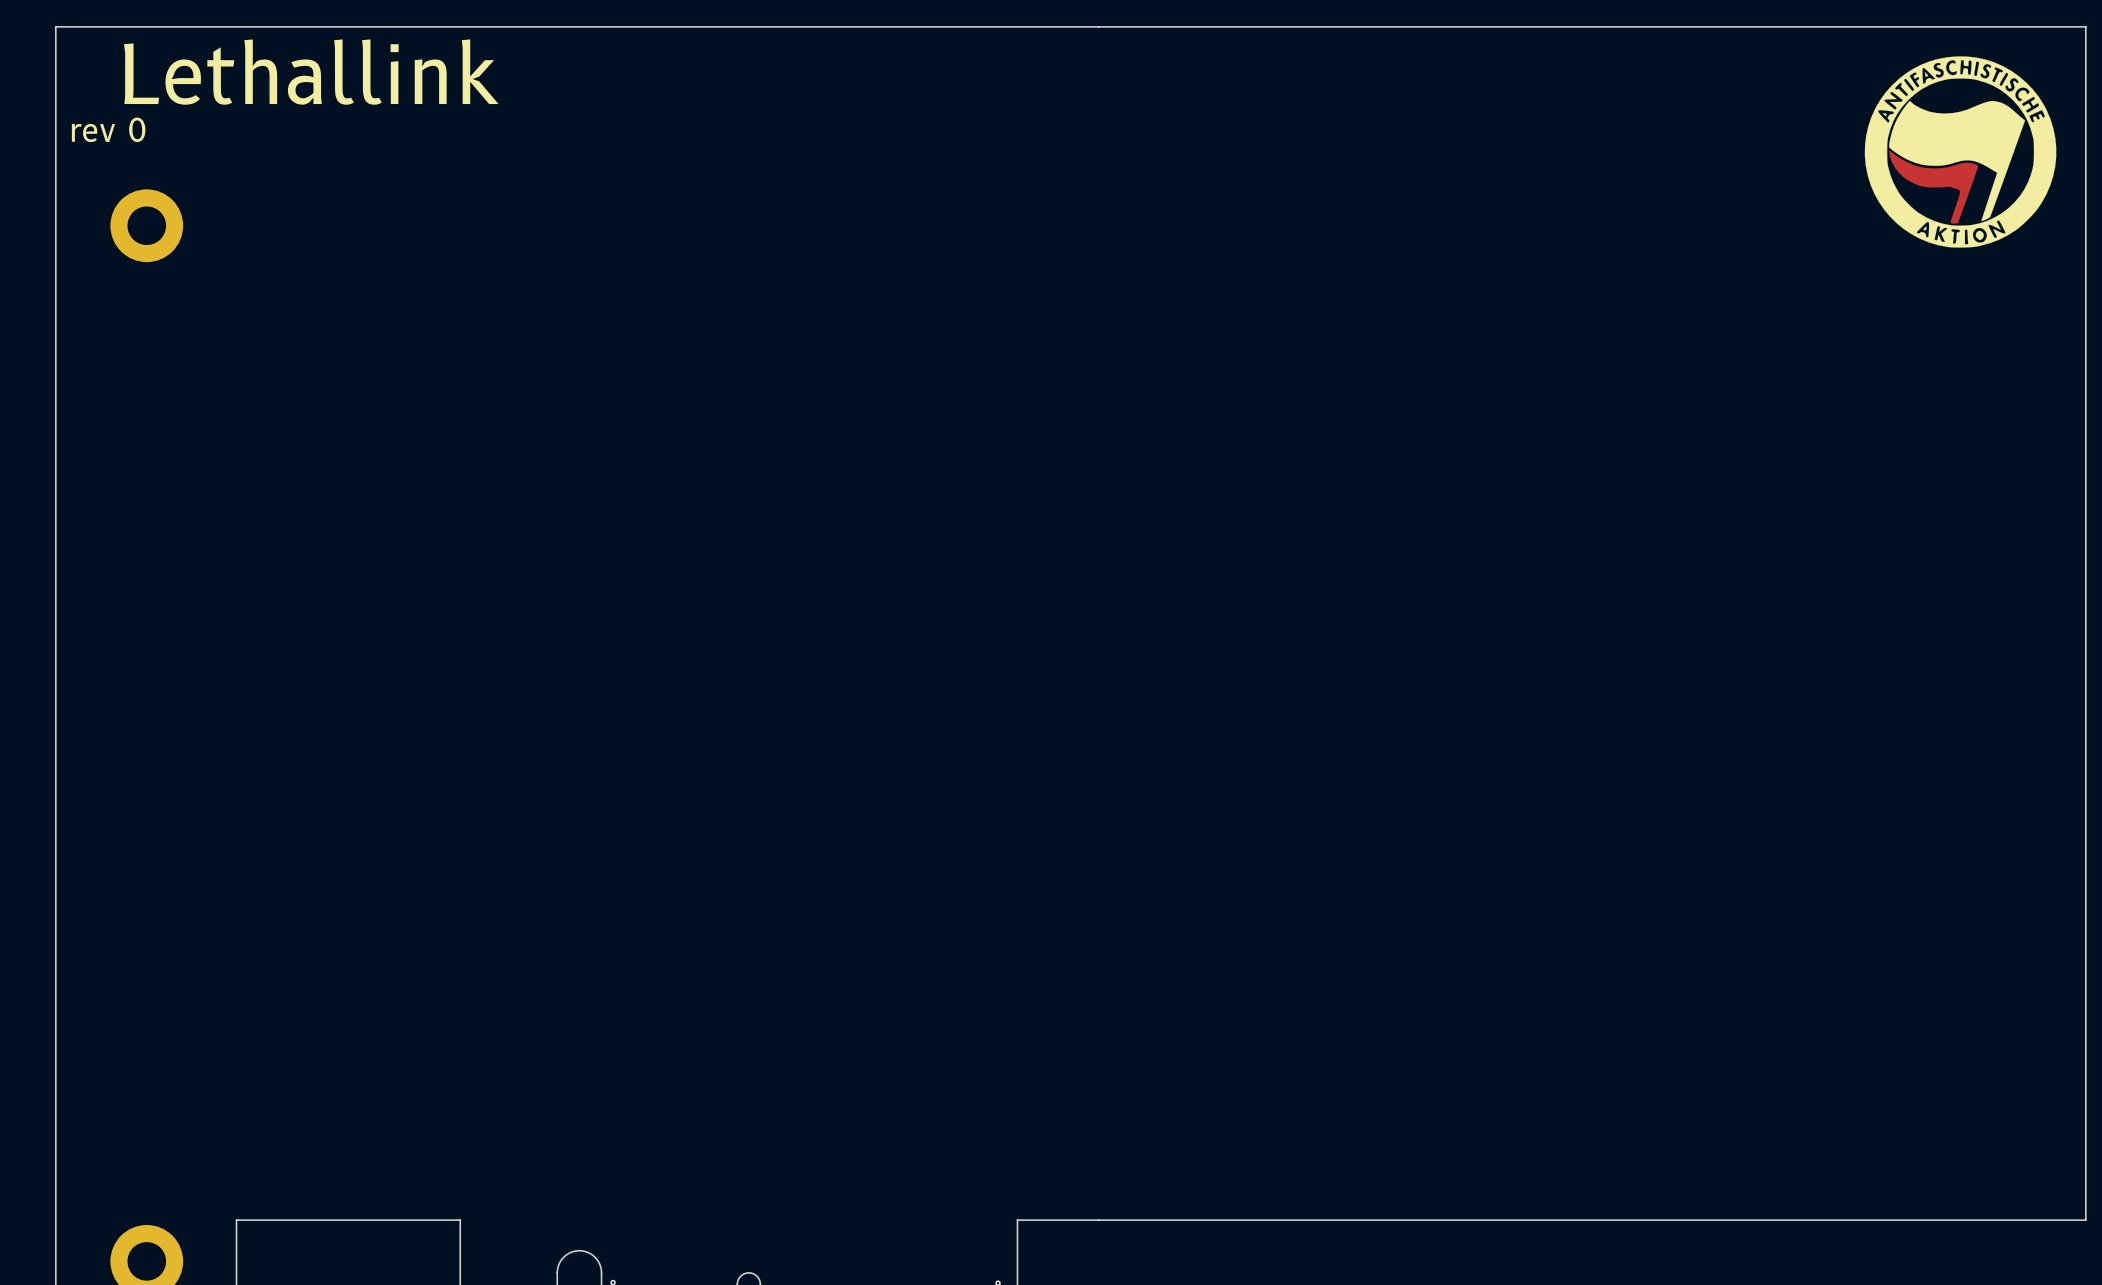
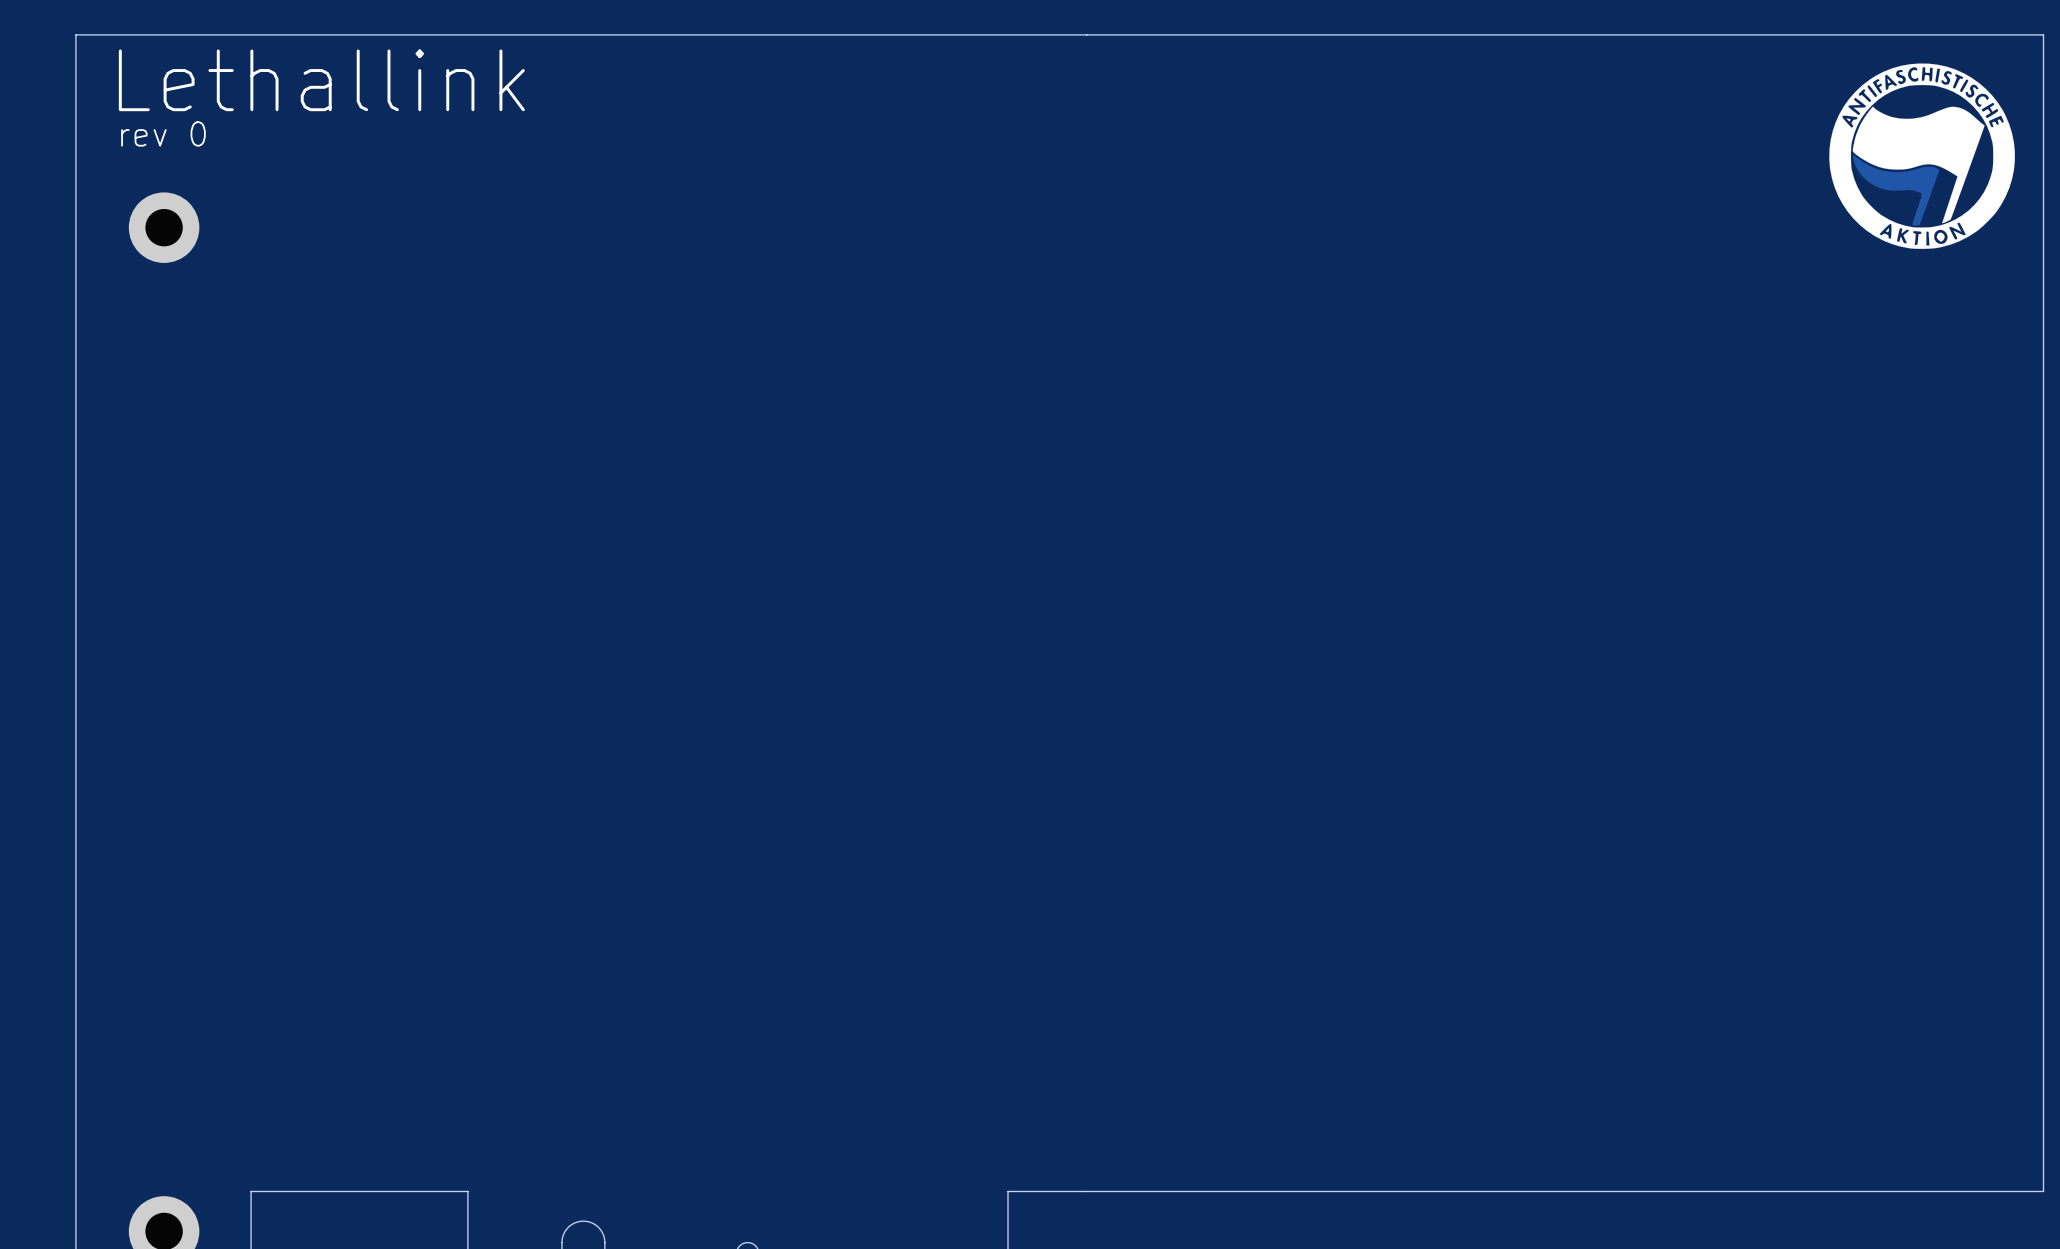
text position: rev 0 (108, 129) -> rev 0 (163, 133)

